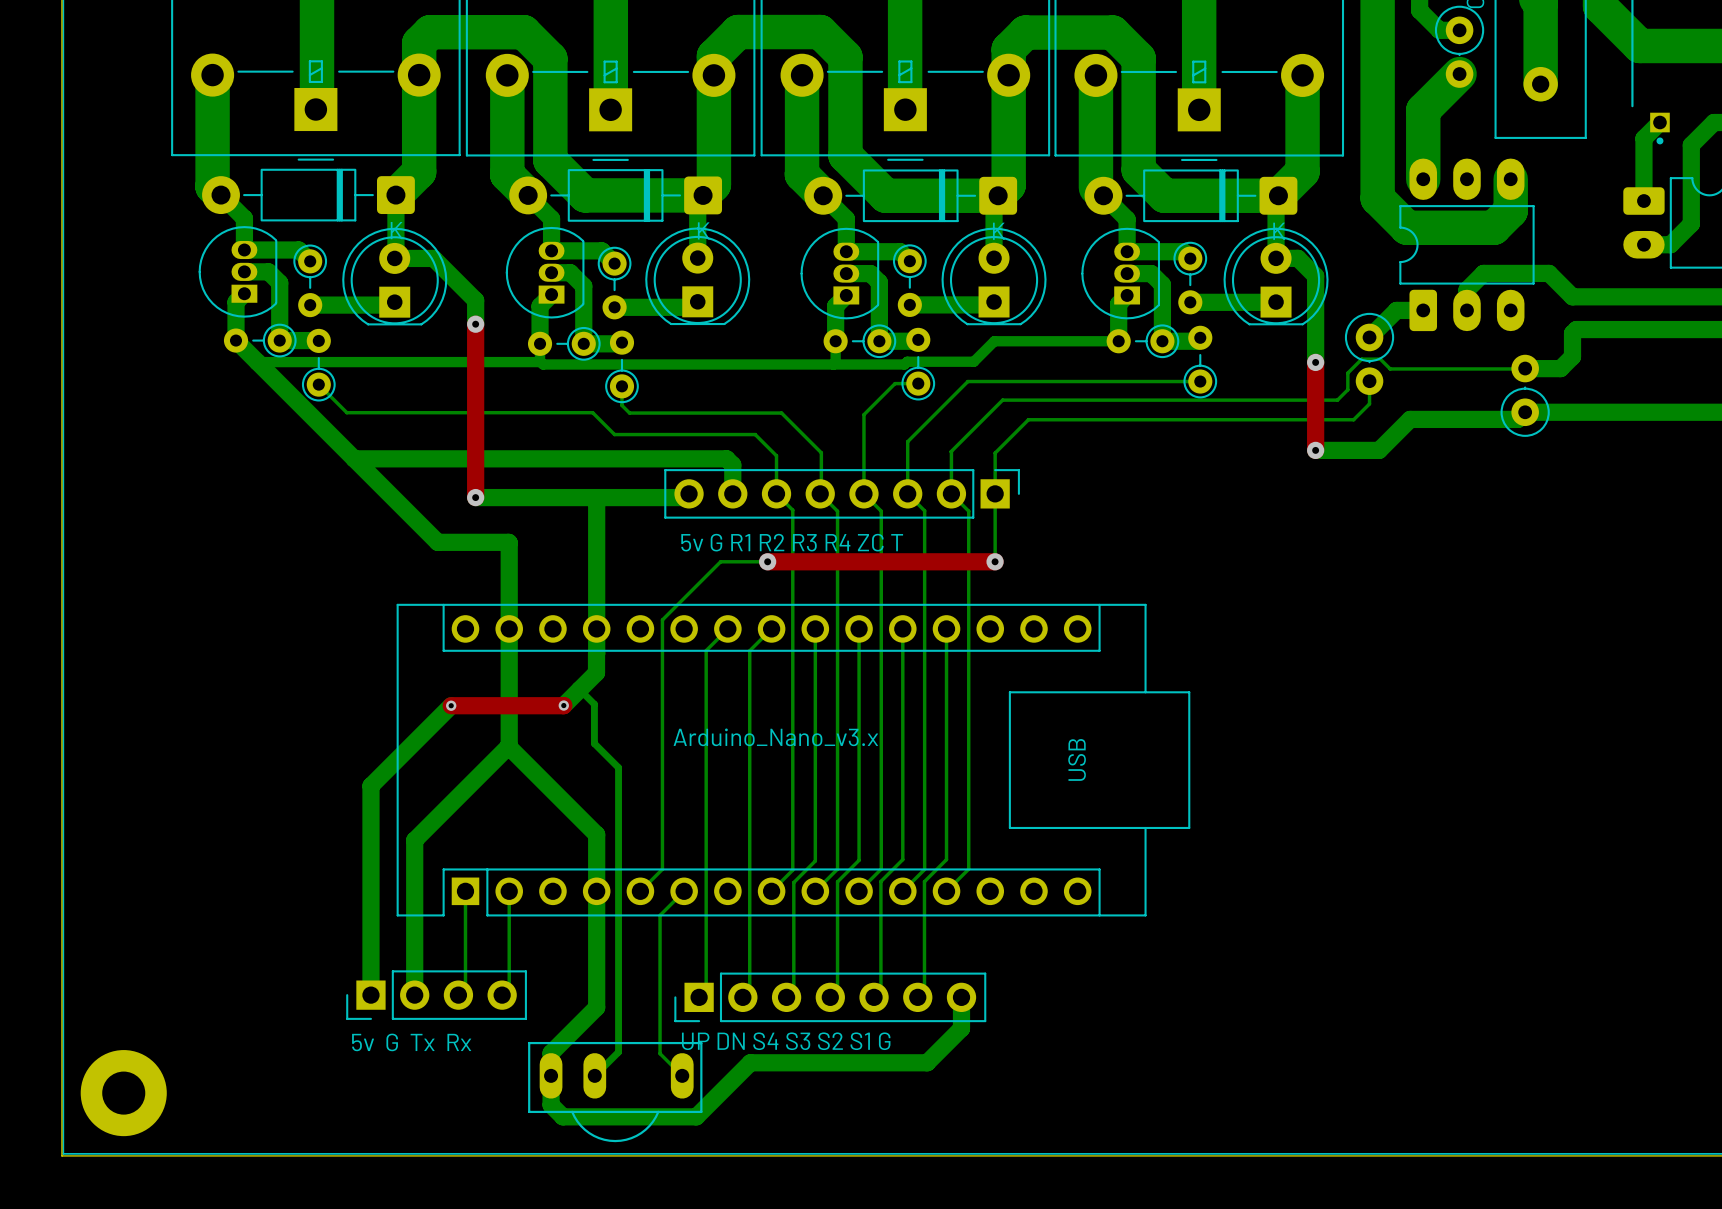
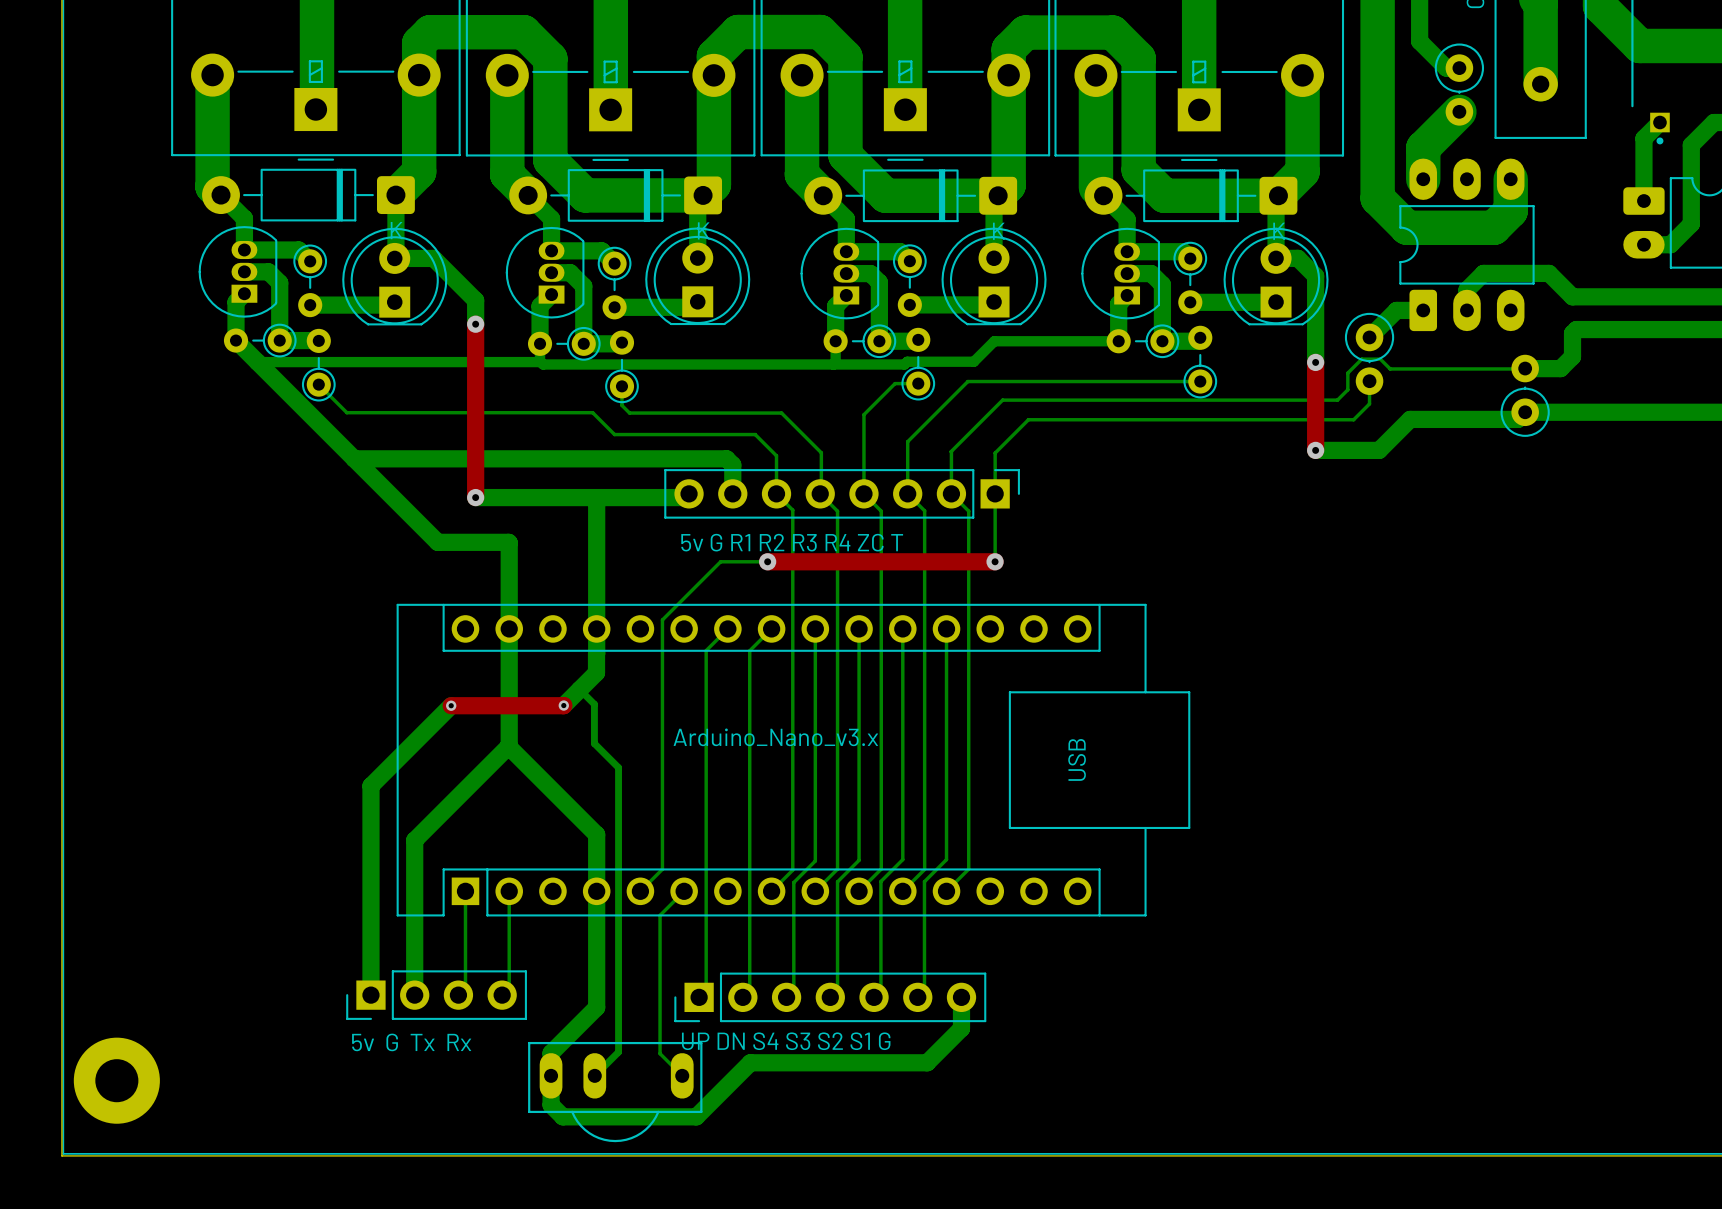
bottom track: (1419, 10) (1439, 30) (1459, 30) -> (1419, 10) (1419, 41) (1446, 68) (1459, 68)
part position: (1459, 46) -> (1459, 84)
bottom track: (1459, 74) (1423, 110) (1423, 147) -> (1459, 111) (1423, 147)
part position: (123, 1093) -> (116, 1080)

